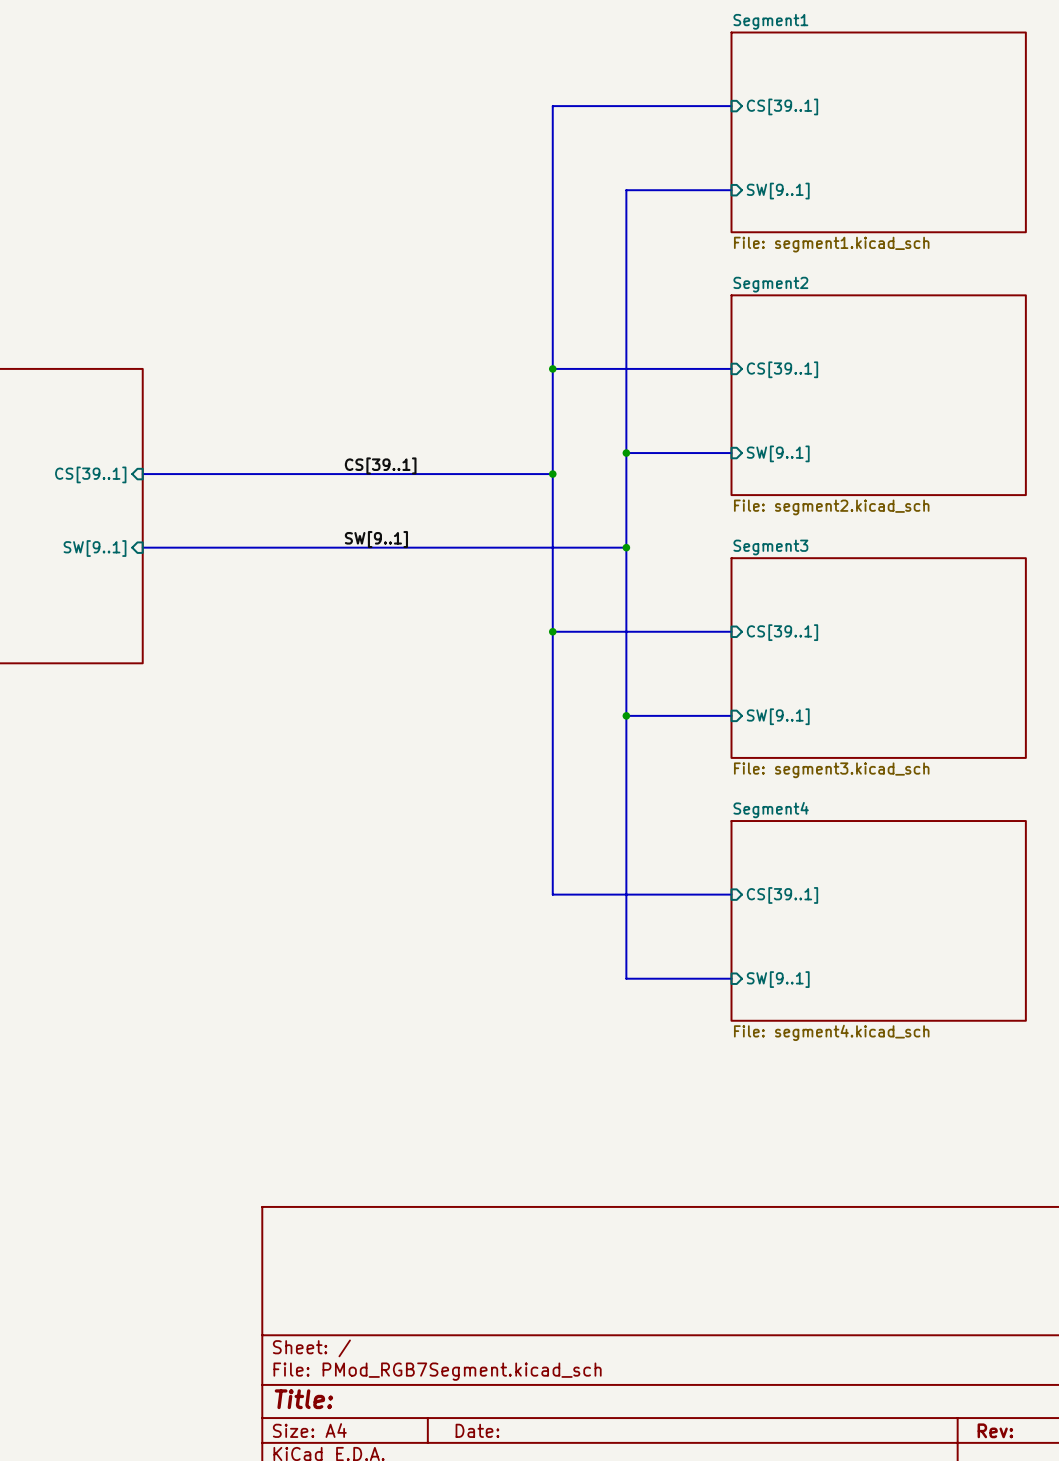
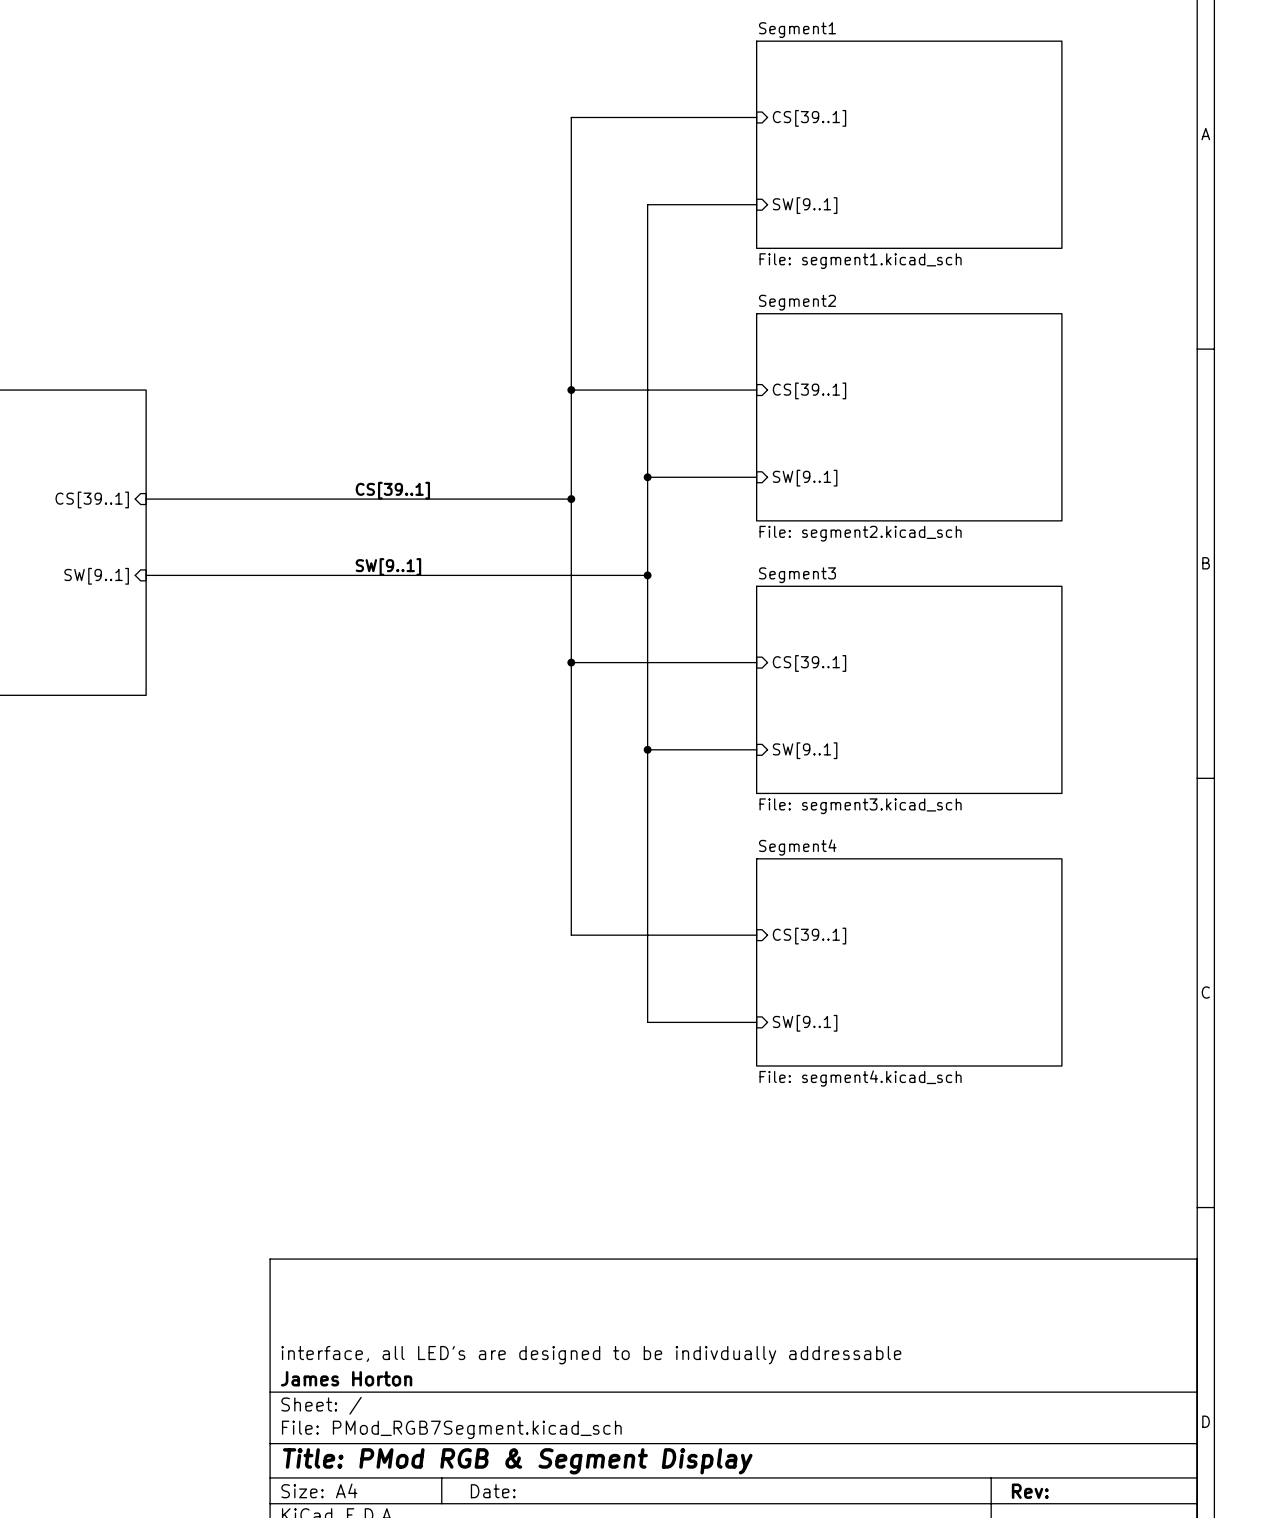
title block: none -> interface, all LED's are designed to be indivdually addressable (591, 1355)
title block: none -> James Horton (346, 1378)
title block: Title: (303, 1399) -> Title: PMod RGB & Segment Display (517, 1461)

